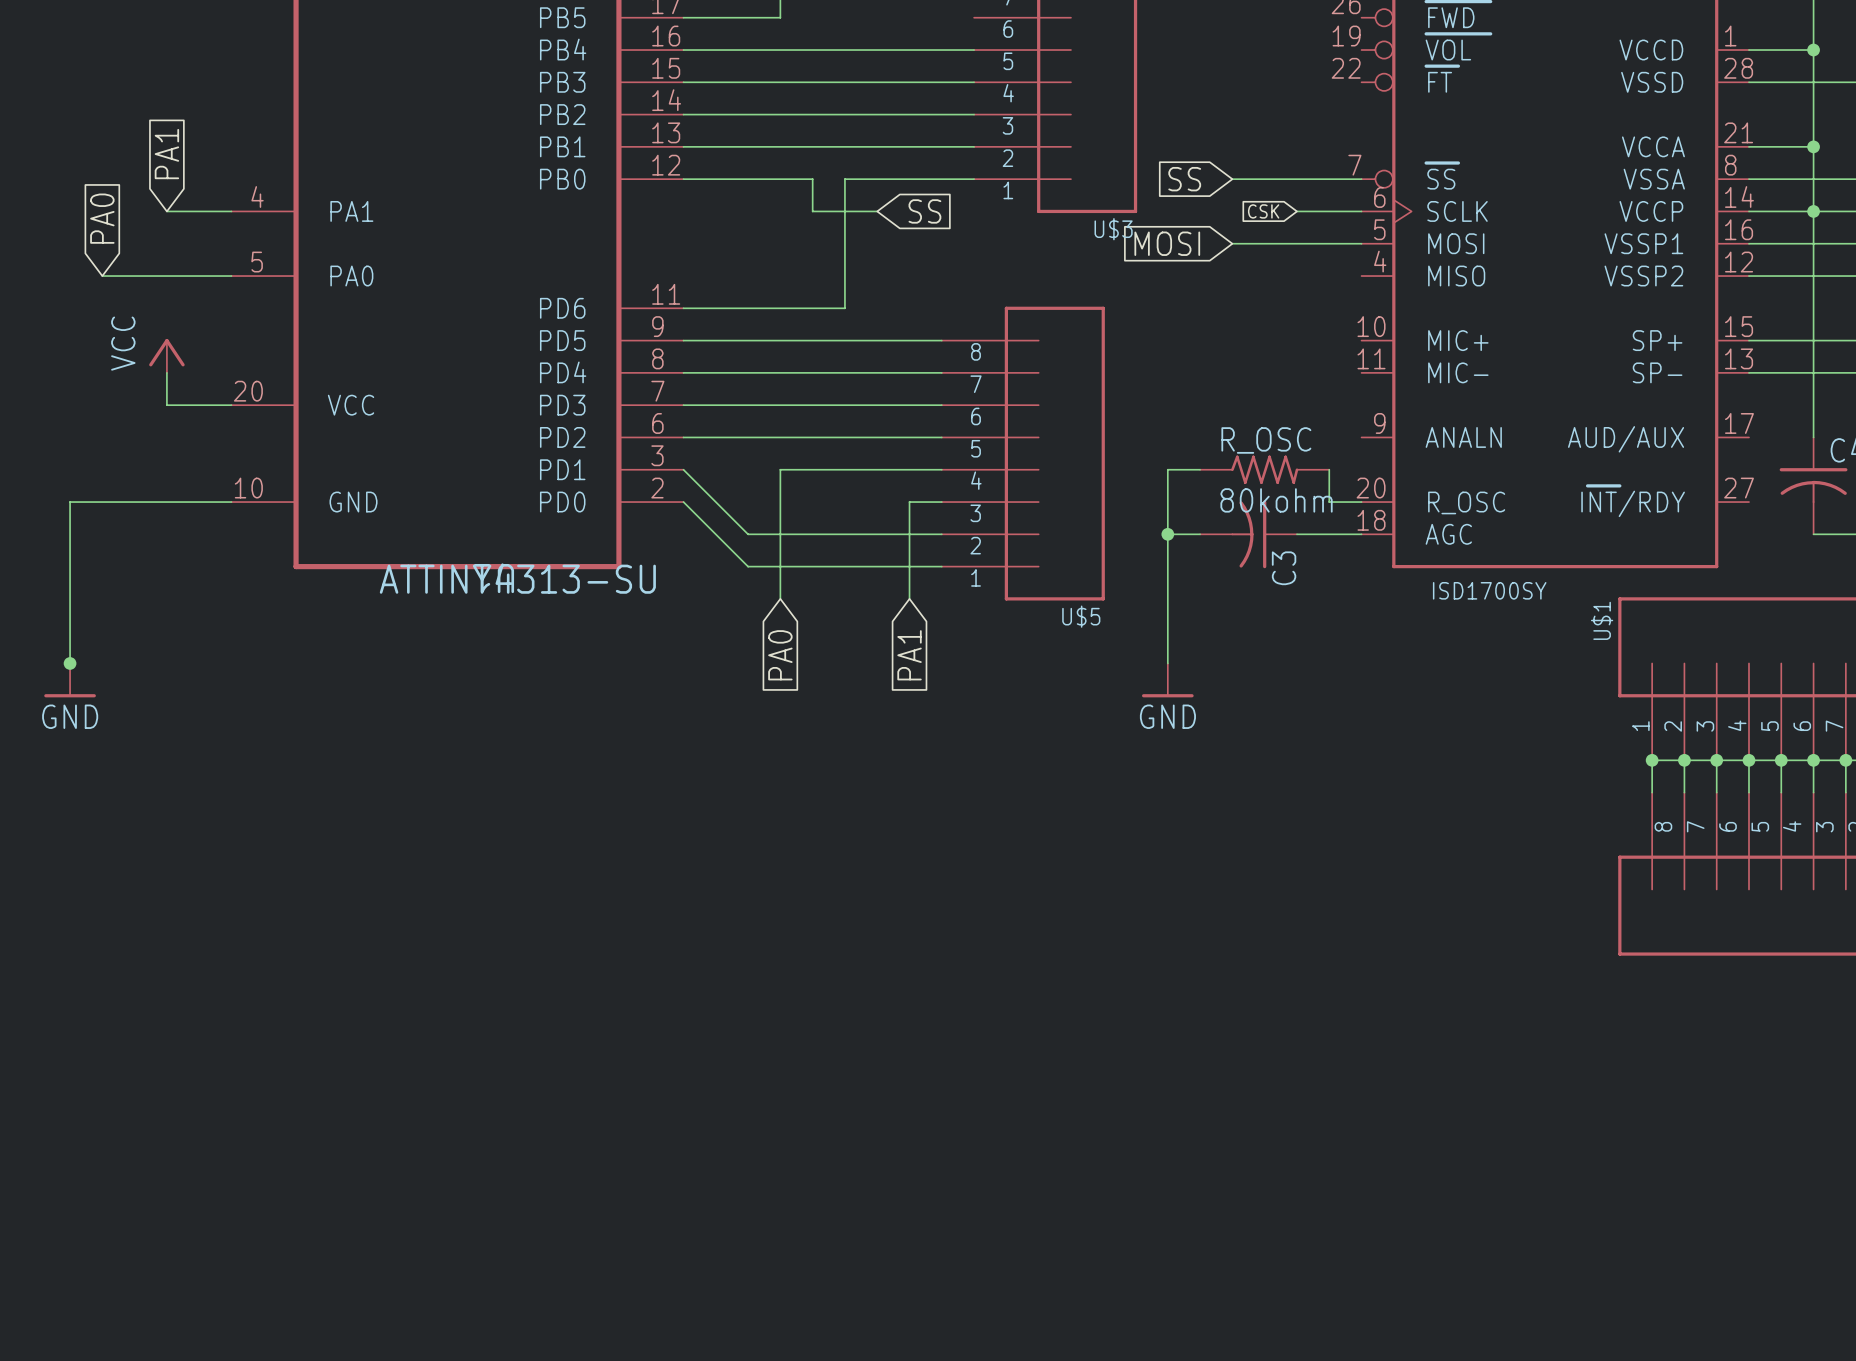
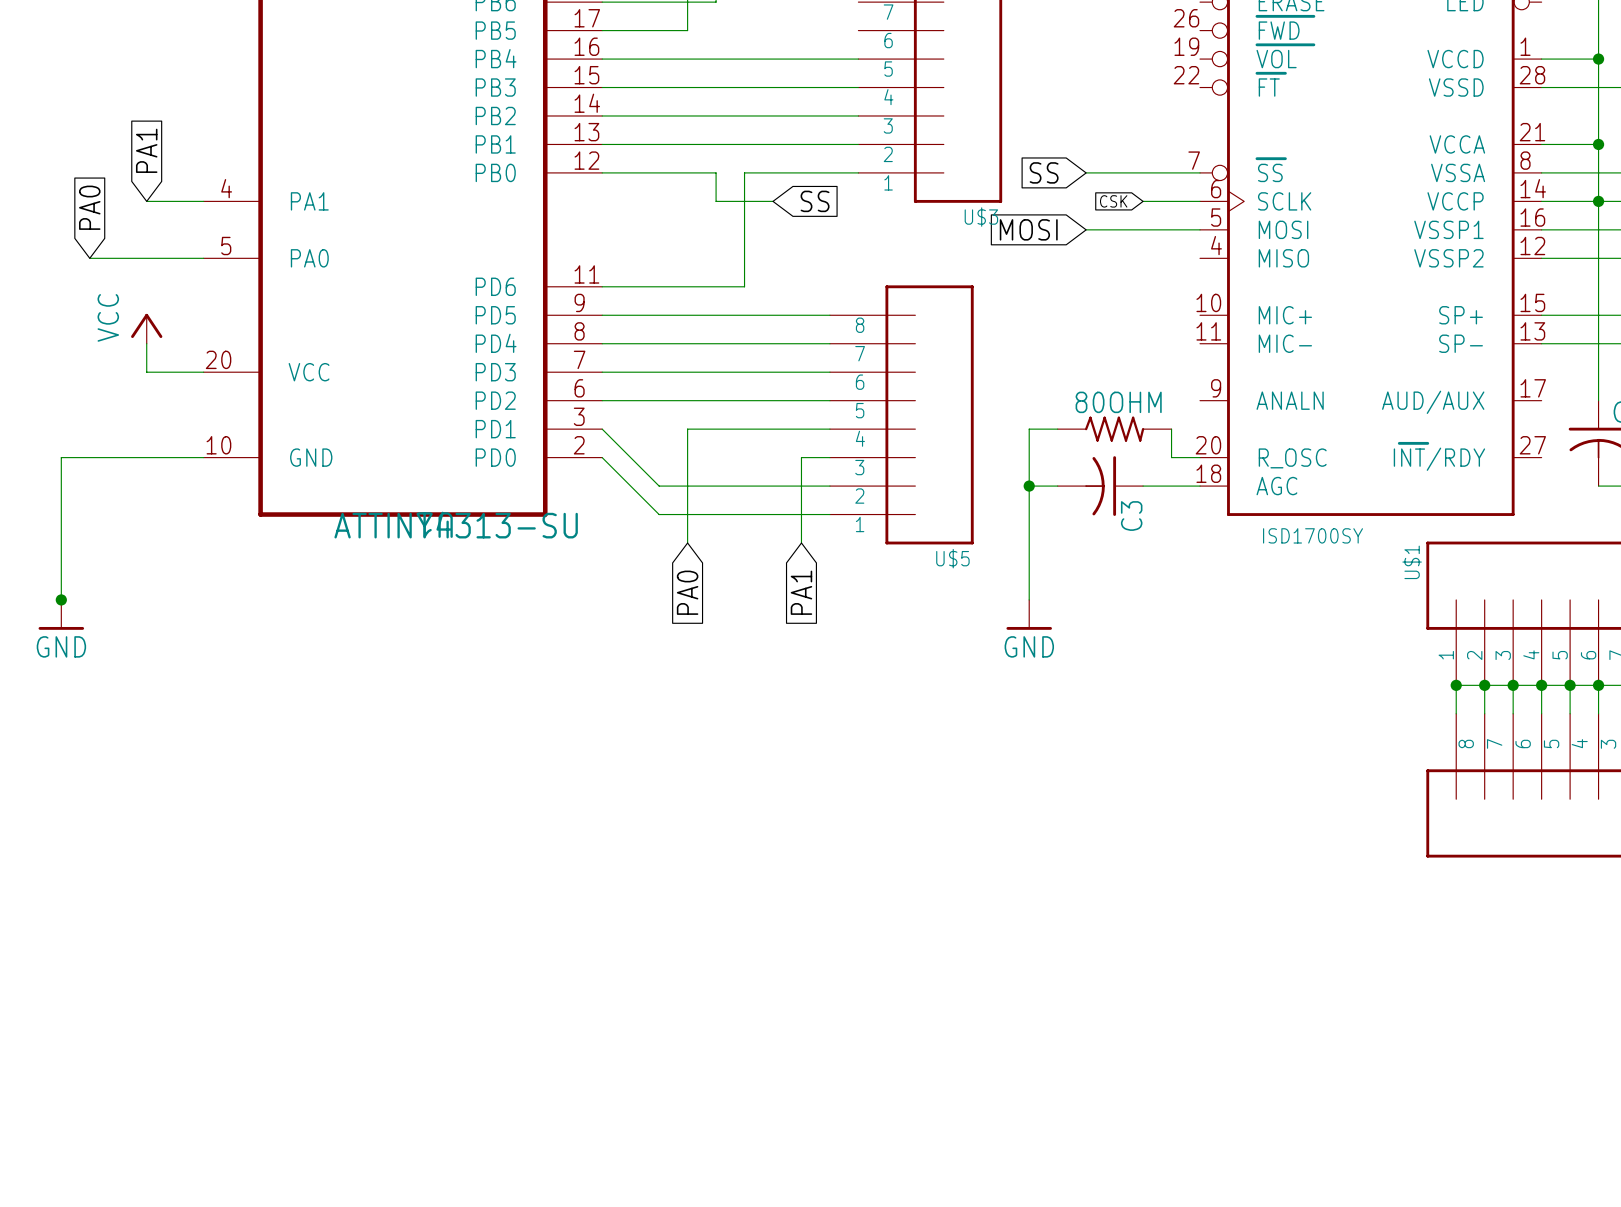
R_OSC name: R_OSC (1266, 440) -> 80OHM (1118, 402)
R_OSC value: 80kohm (1276, 500) -> none

